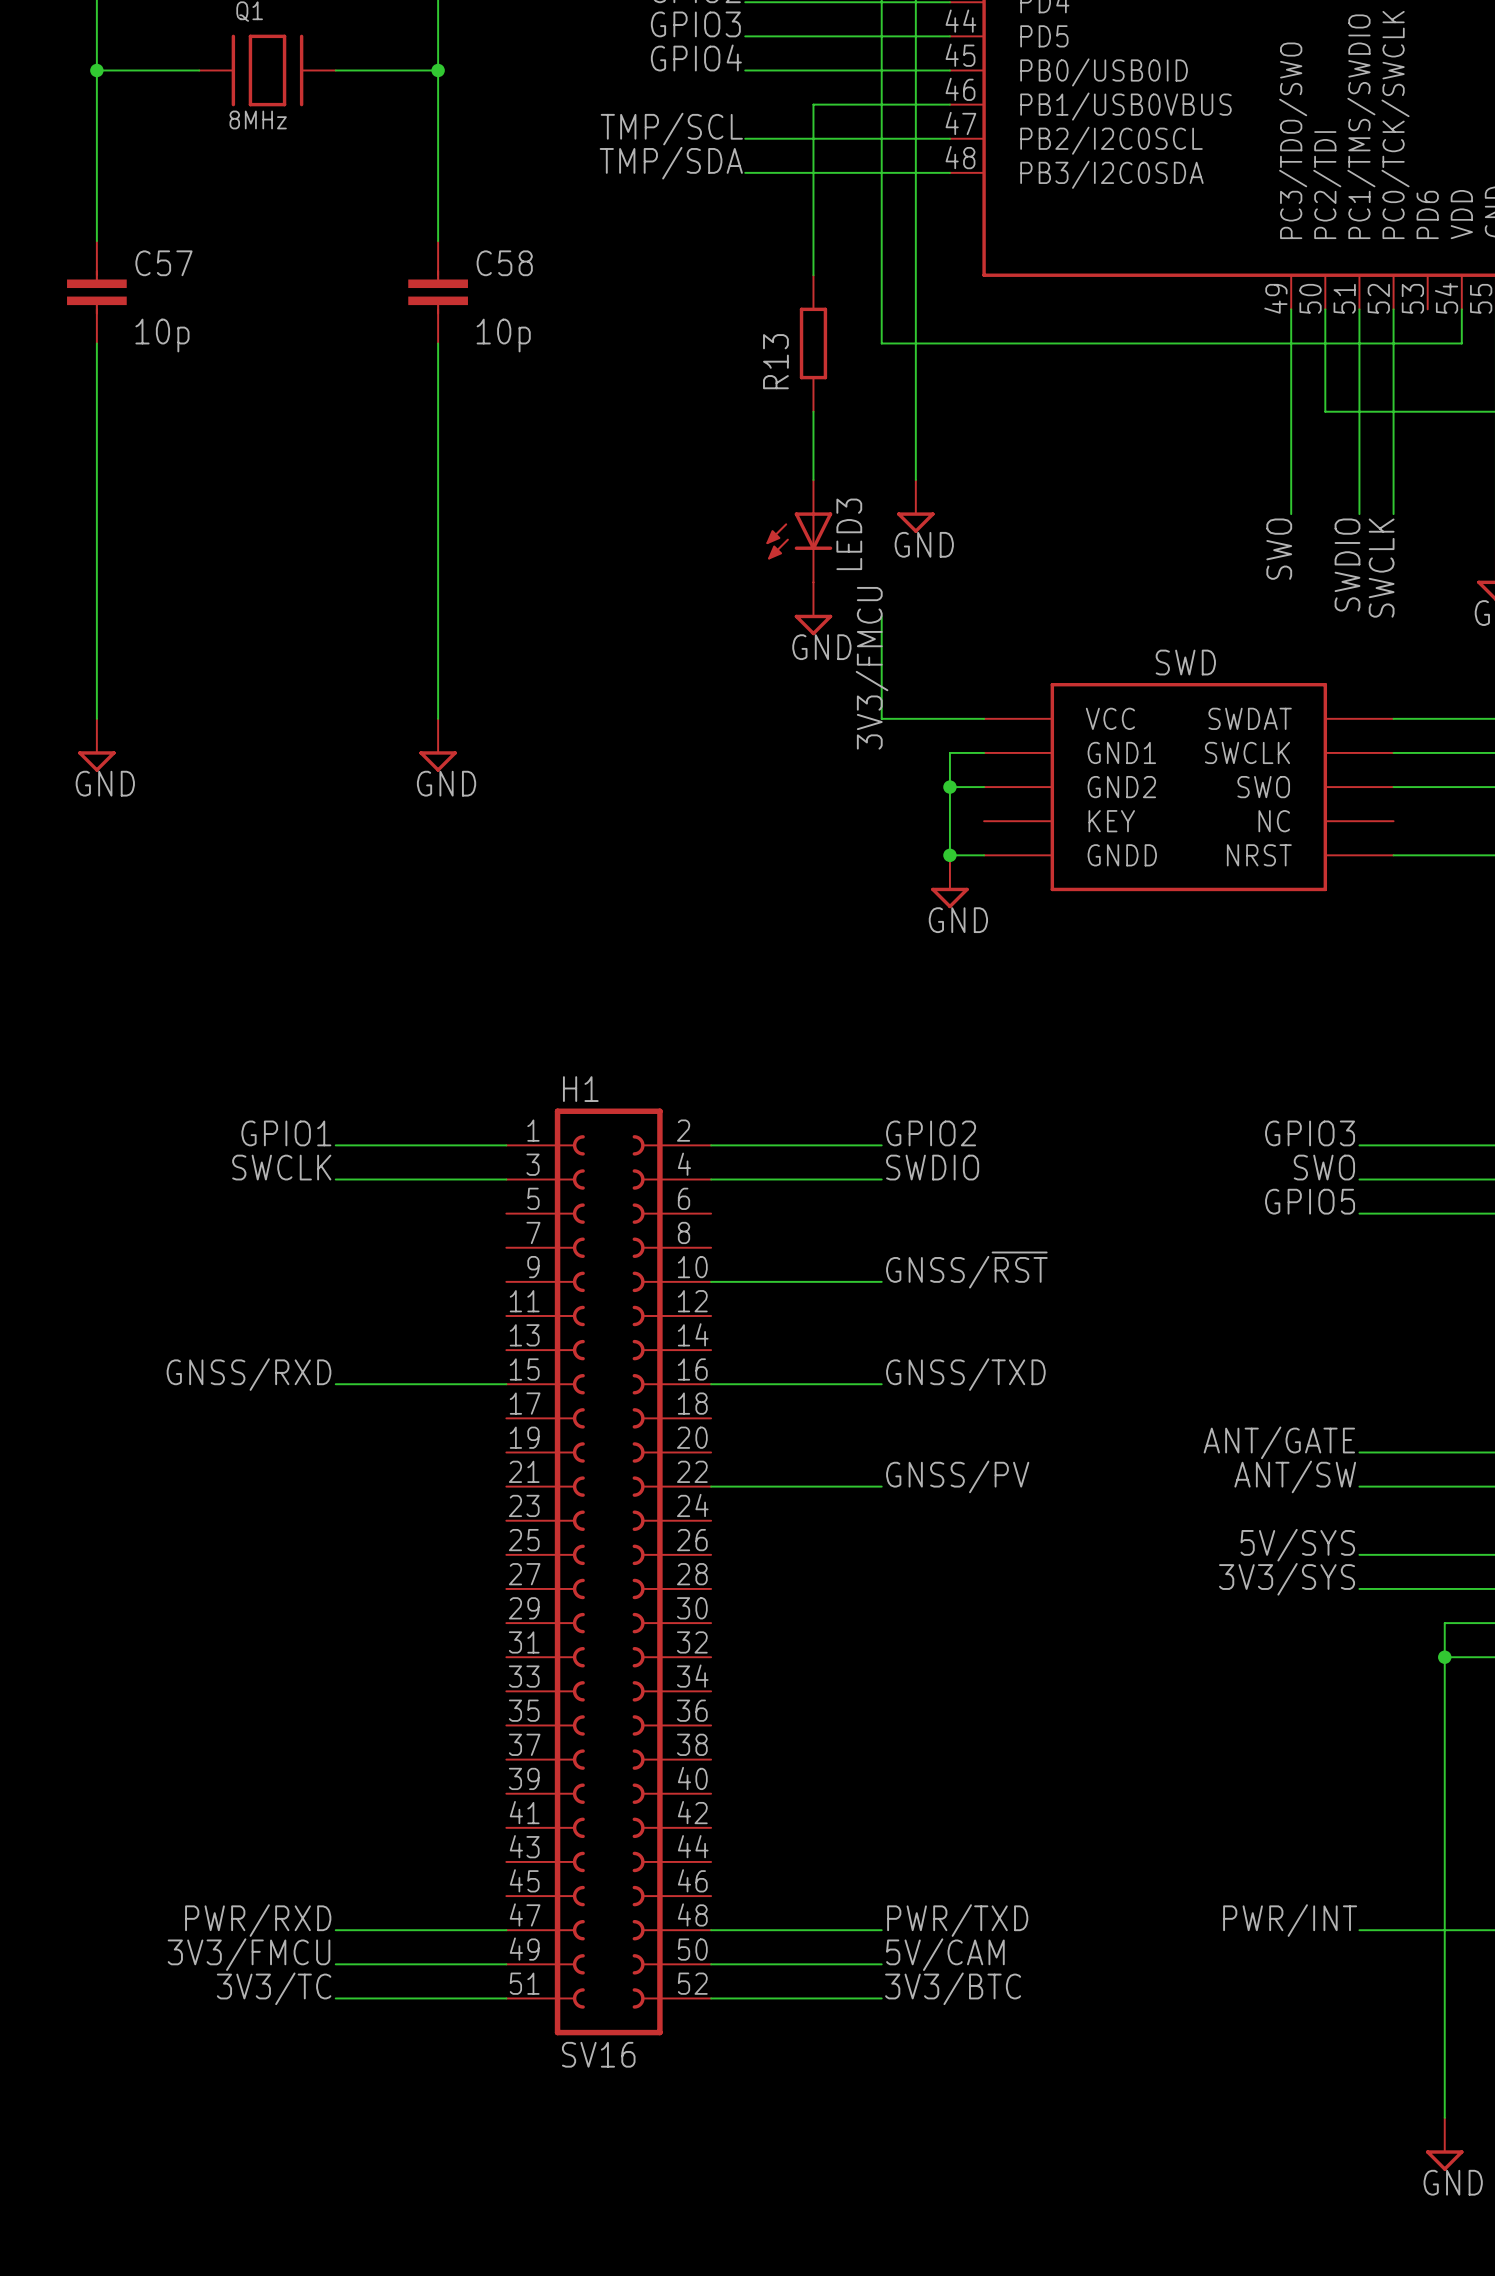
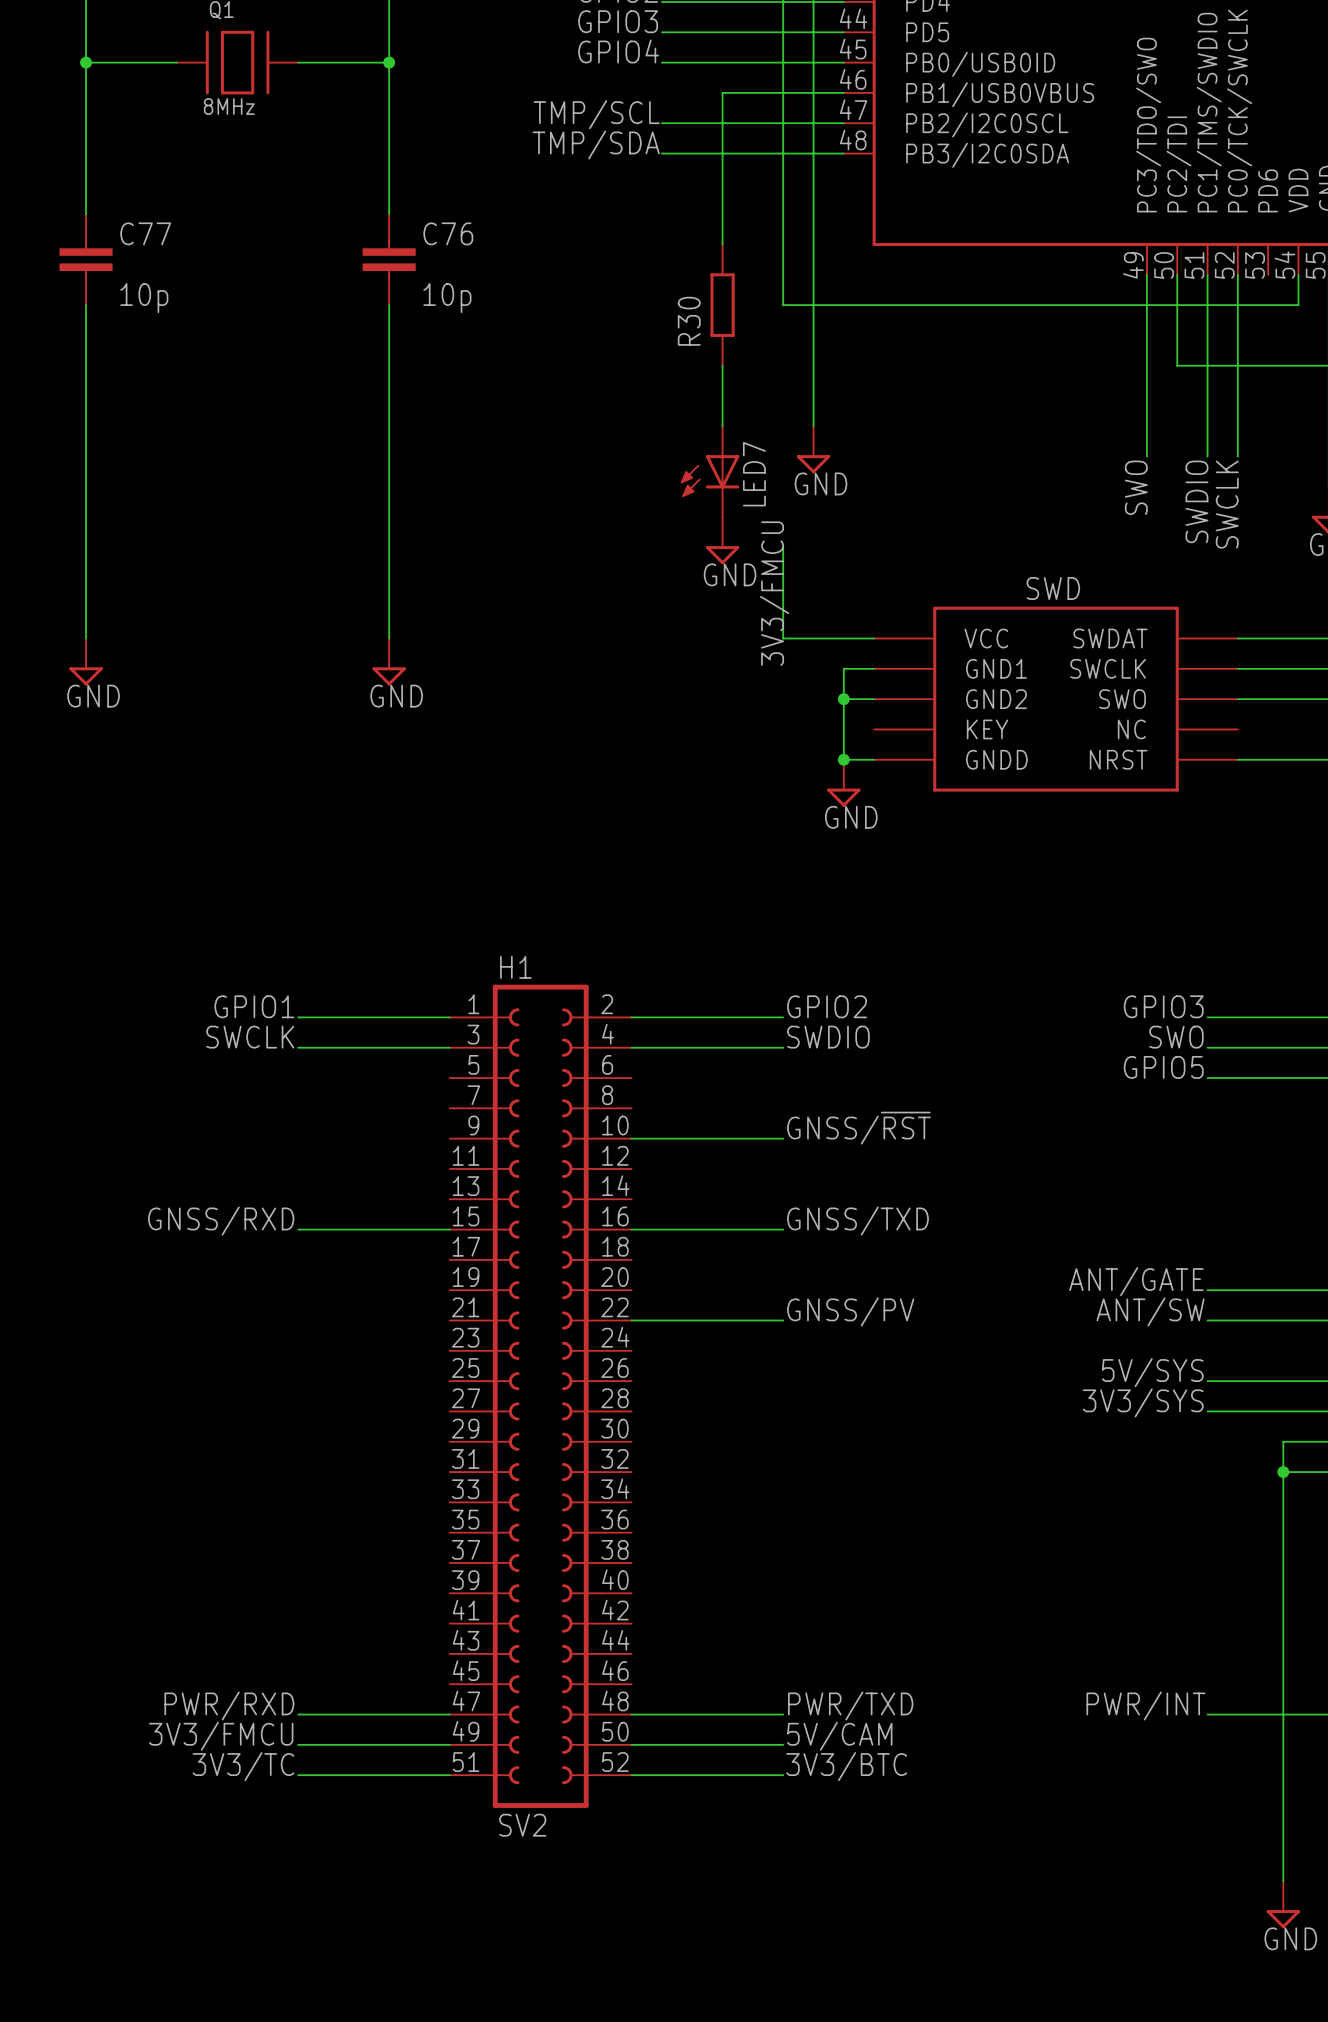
C57 name: C57 (163, 263) -> C77 (145, 233)
C58 name: C58 (504, 263) -> C76 (448, 233)
R13 name: R13 (775, 361) -> R30 (689, 321)
LED3 name: LED3 (849, 534) -> LED7 (754, 474)
SV16 name: SV16 (598, 2054) -> SV2 (522, 1825)

